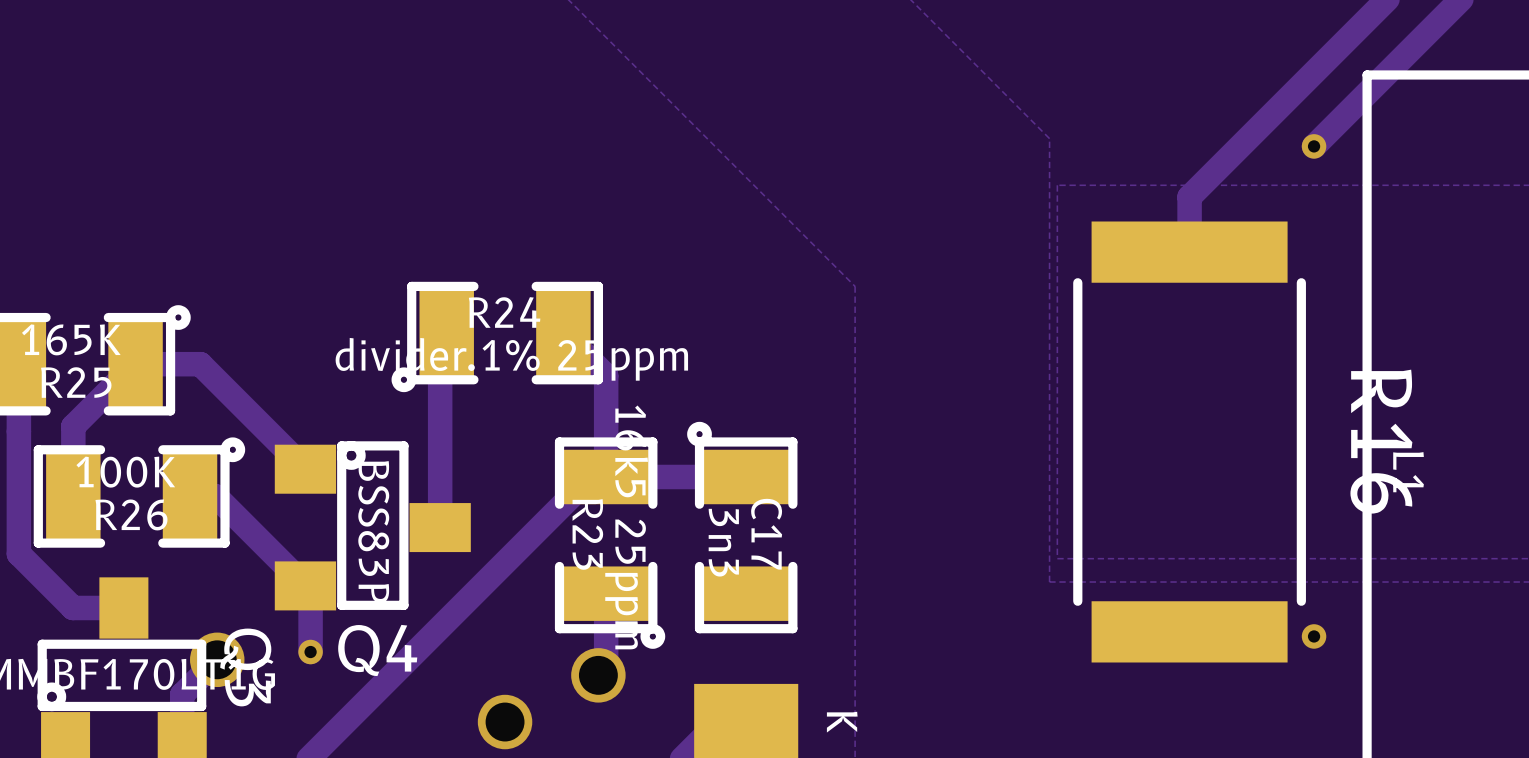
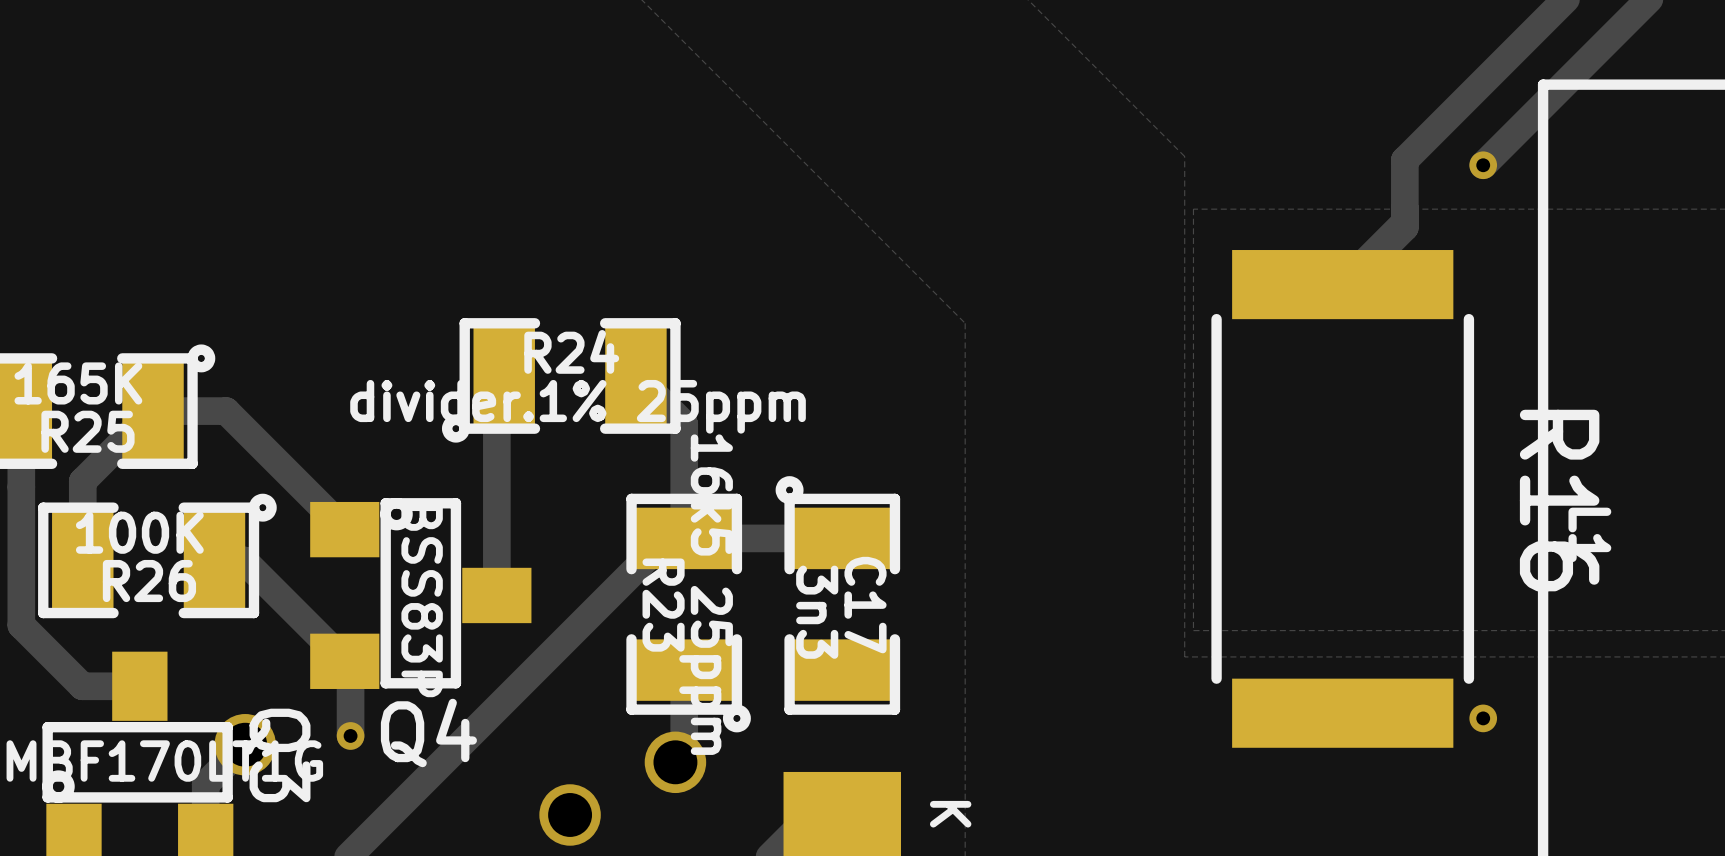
track: (1244, 141) (1189, 196) (1189, 252) -> (1404, 160) (1404, 227) (1347, 284) (1342, 284) (1404, 222)

